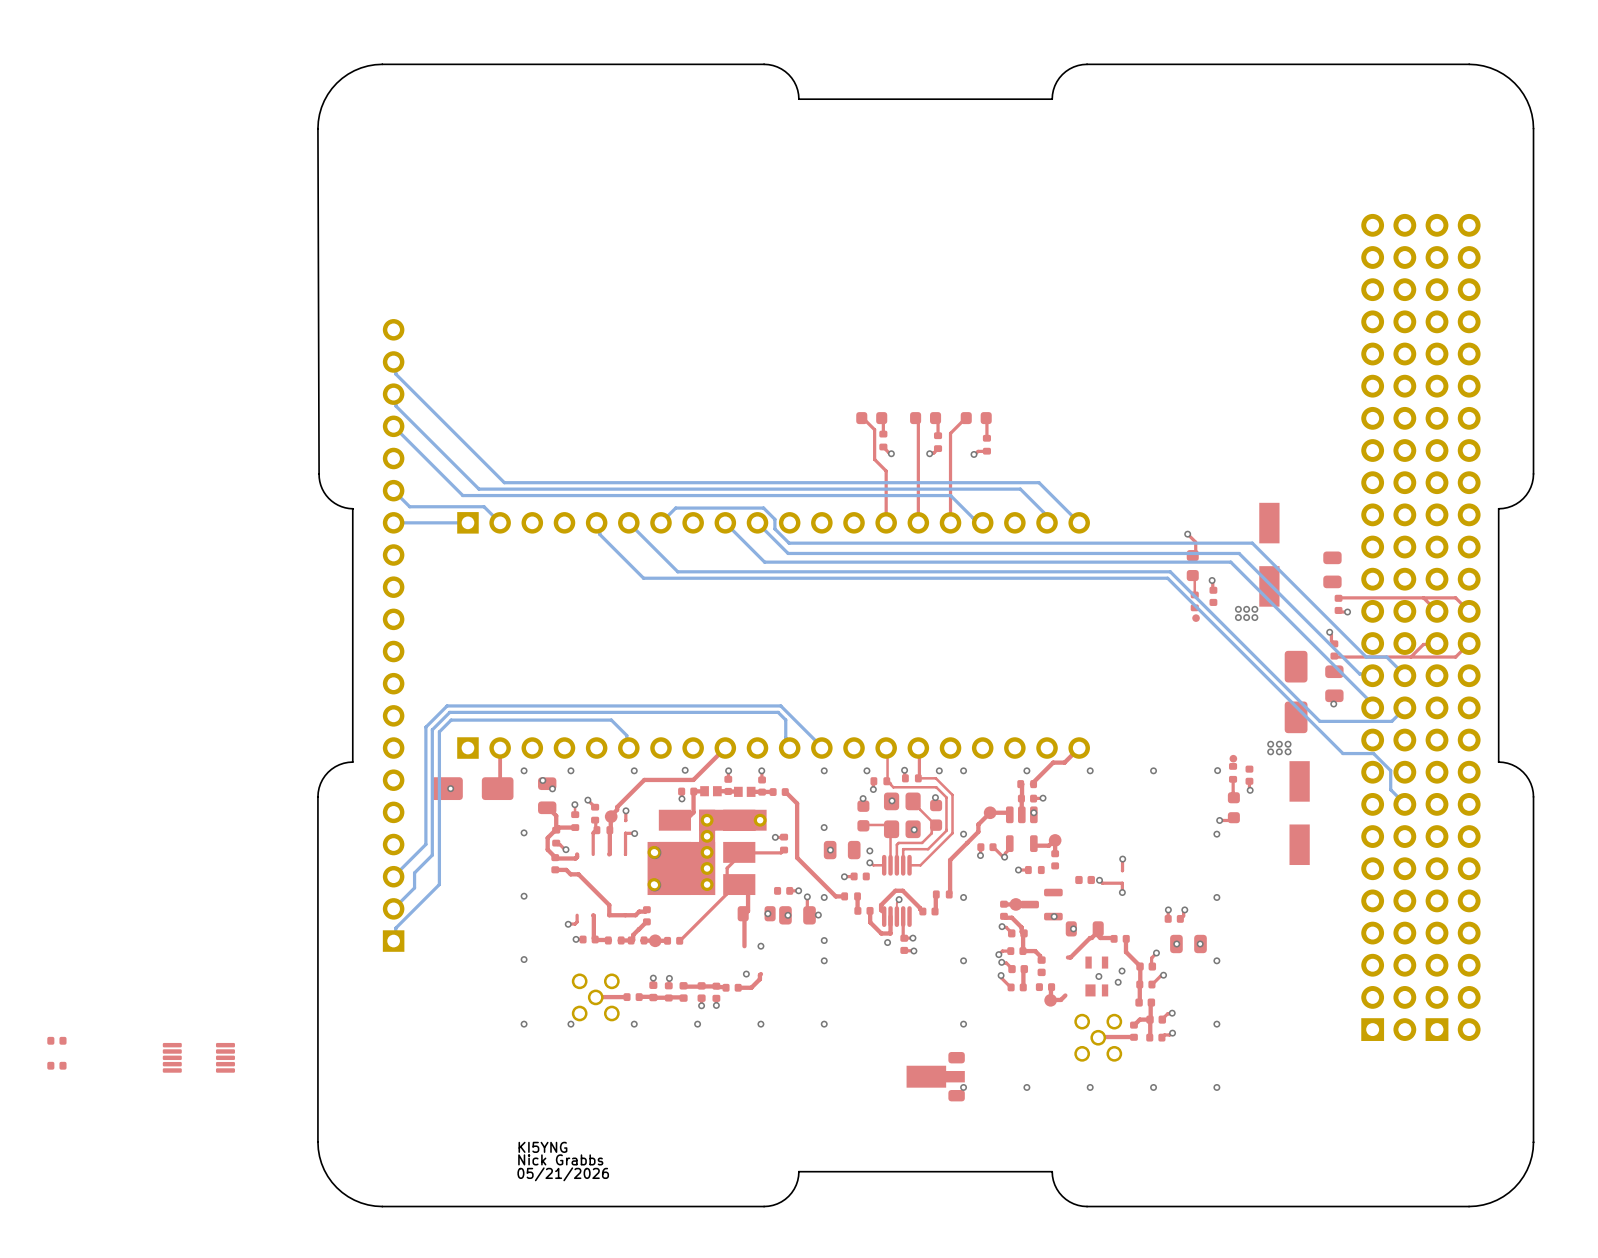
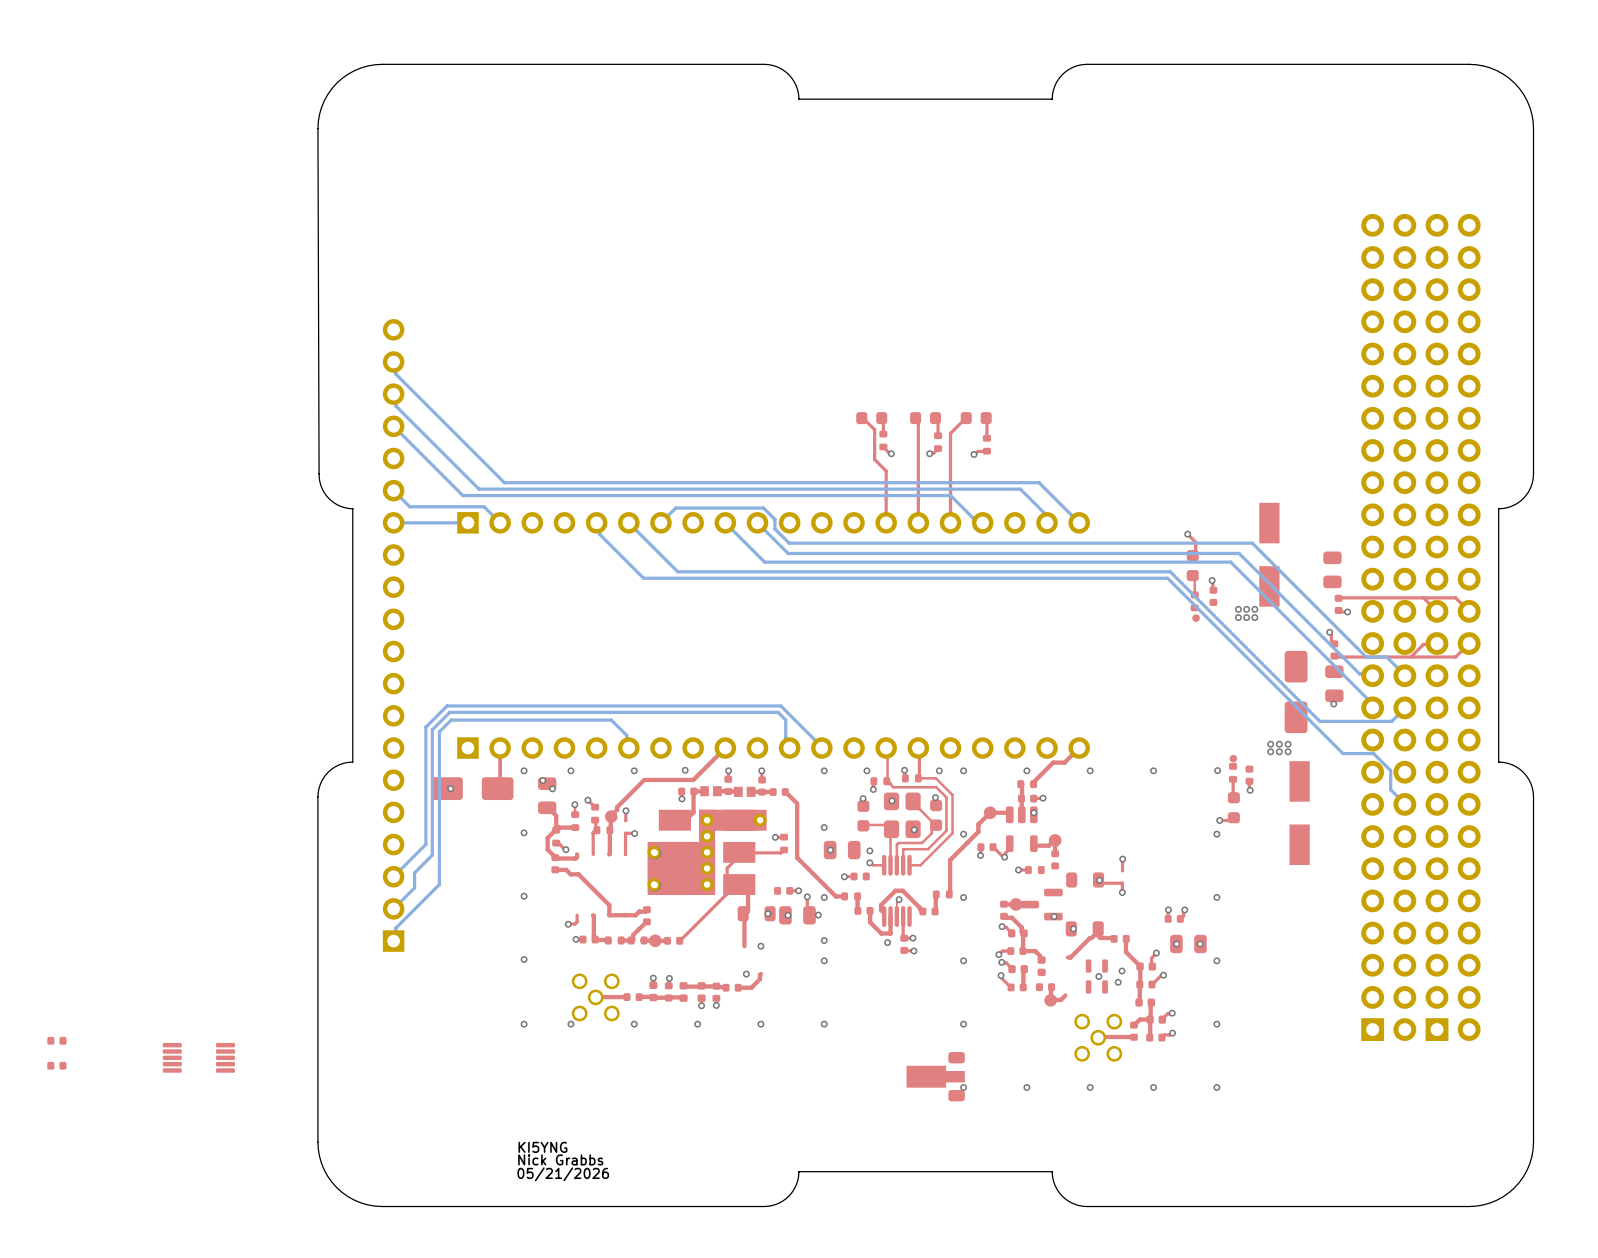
part footprint: [1075, 875, 1095, 885] -> [1066, 872, 1105, 888]
part footprint: [1085, 956, 1109, 997] -> [1085, 959, 1108, 994]

